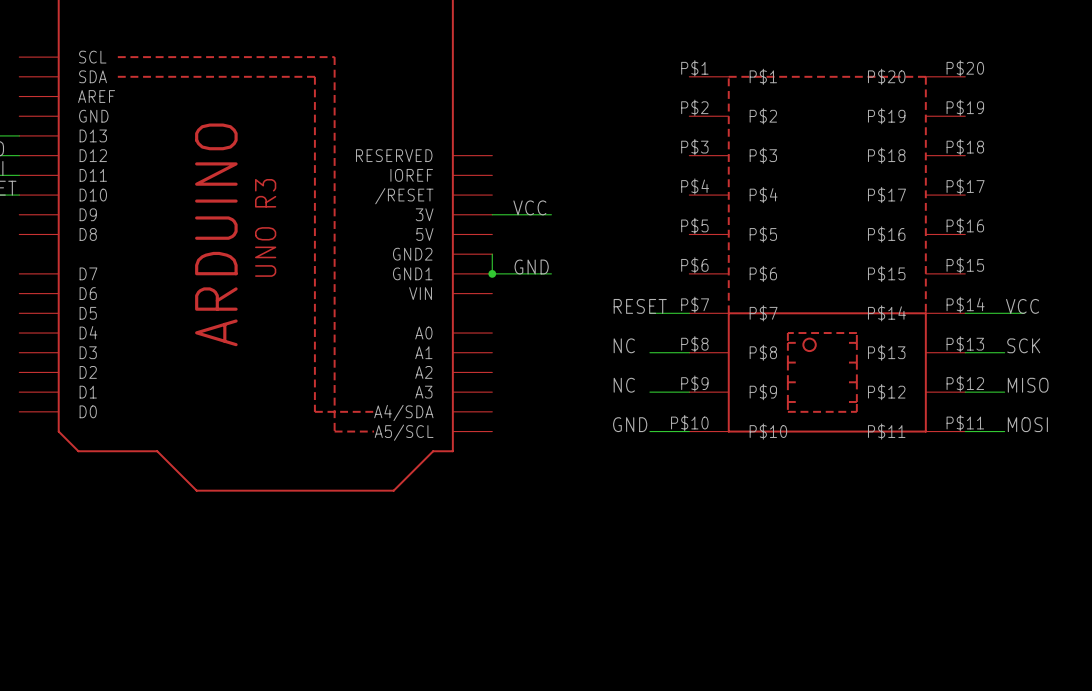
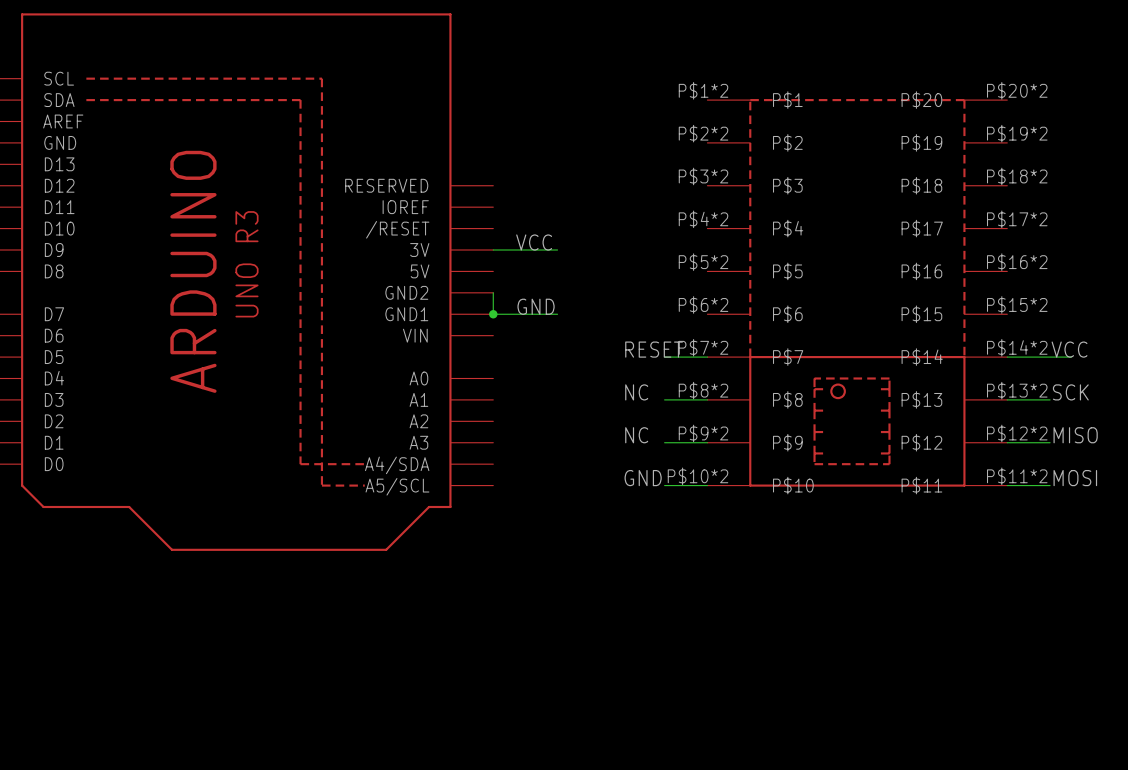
part symbol: [689, 75, 966, 433] -> [707, 99, 1008, 487]

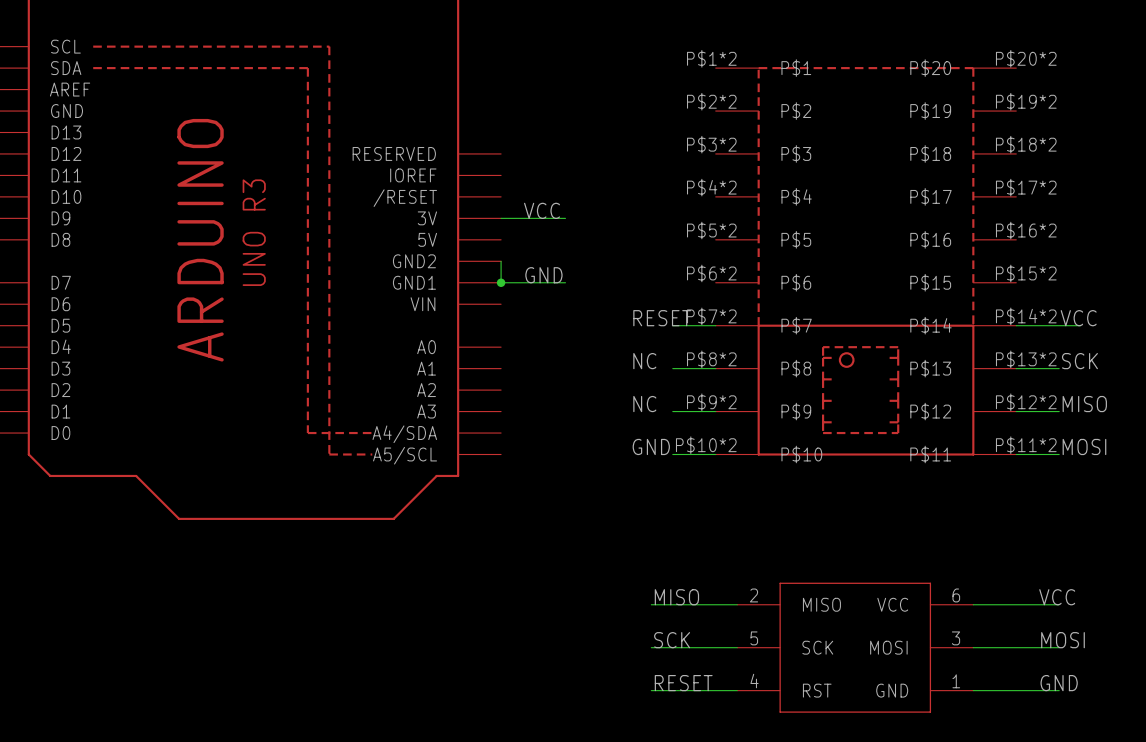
label: none -> MISO (676, 597)
label: none -> VCC (1057, 597)
wire: none -> (651, 604) (737, 604)
wire: none -> (973, 604) (1059, 604)
label: none -> SCK (672, 640)
label: none -> MOSI (1063, 640)
wire: none -> (651, 647) (737, 647)
part: none -> (855, 647)
wire: none -> (973, 647) (1059, 647)
label: none -> RESET (683, 683)
label: none -> GND (1059, 683)
wire: none -> (651, 690) (737, 690)
wire: none -> (973, 690) (1059, 690)

